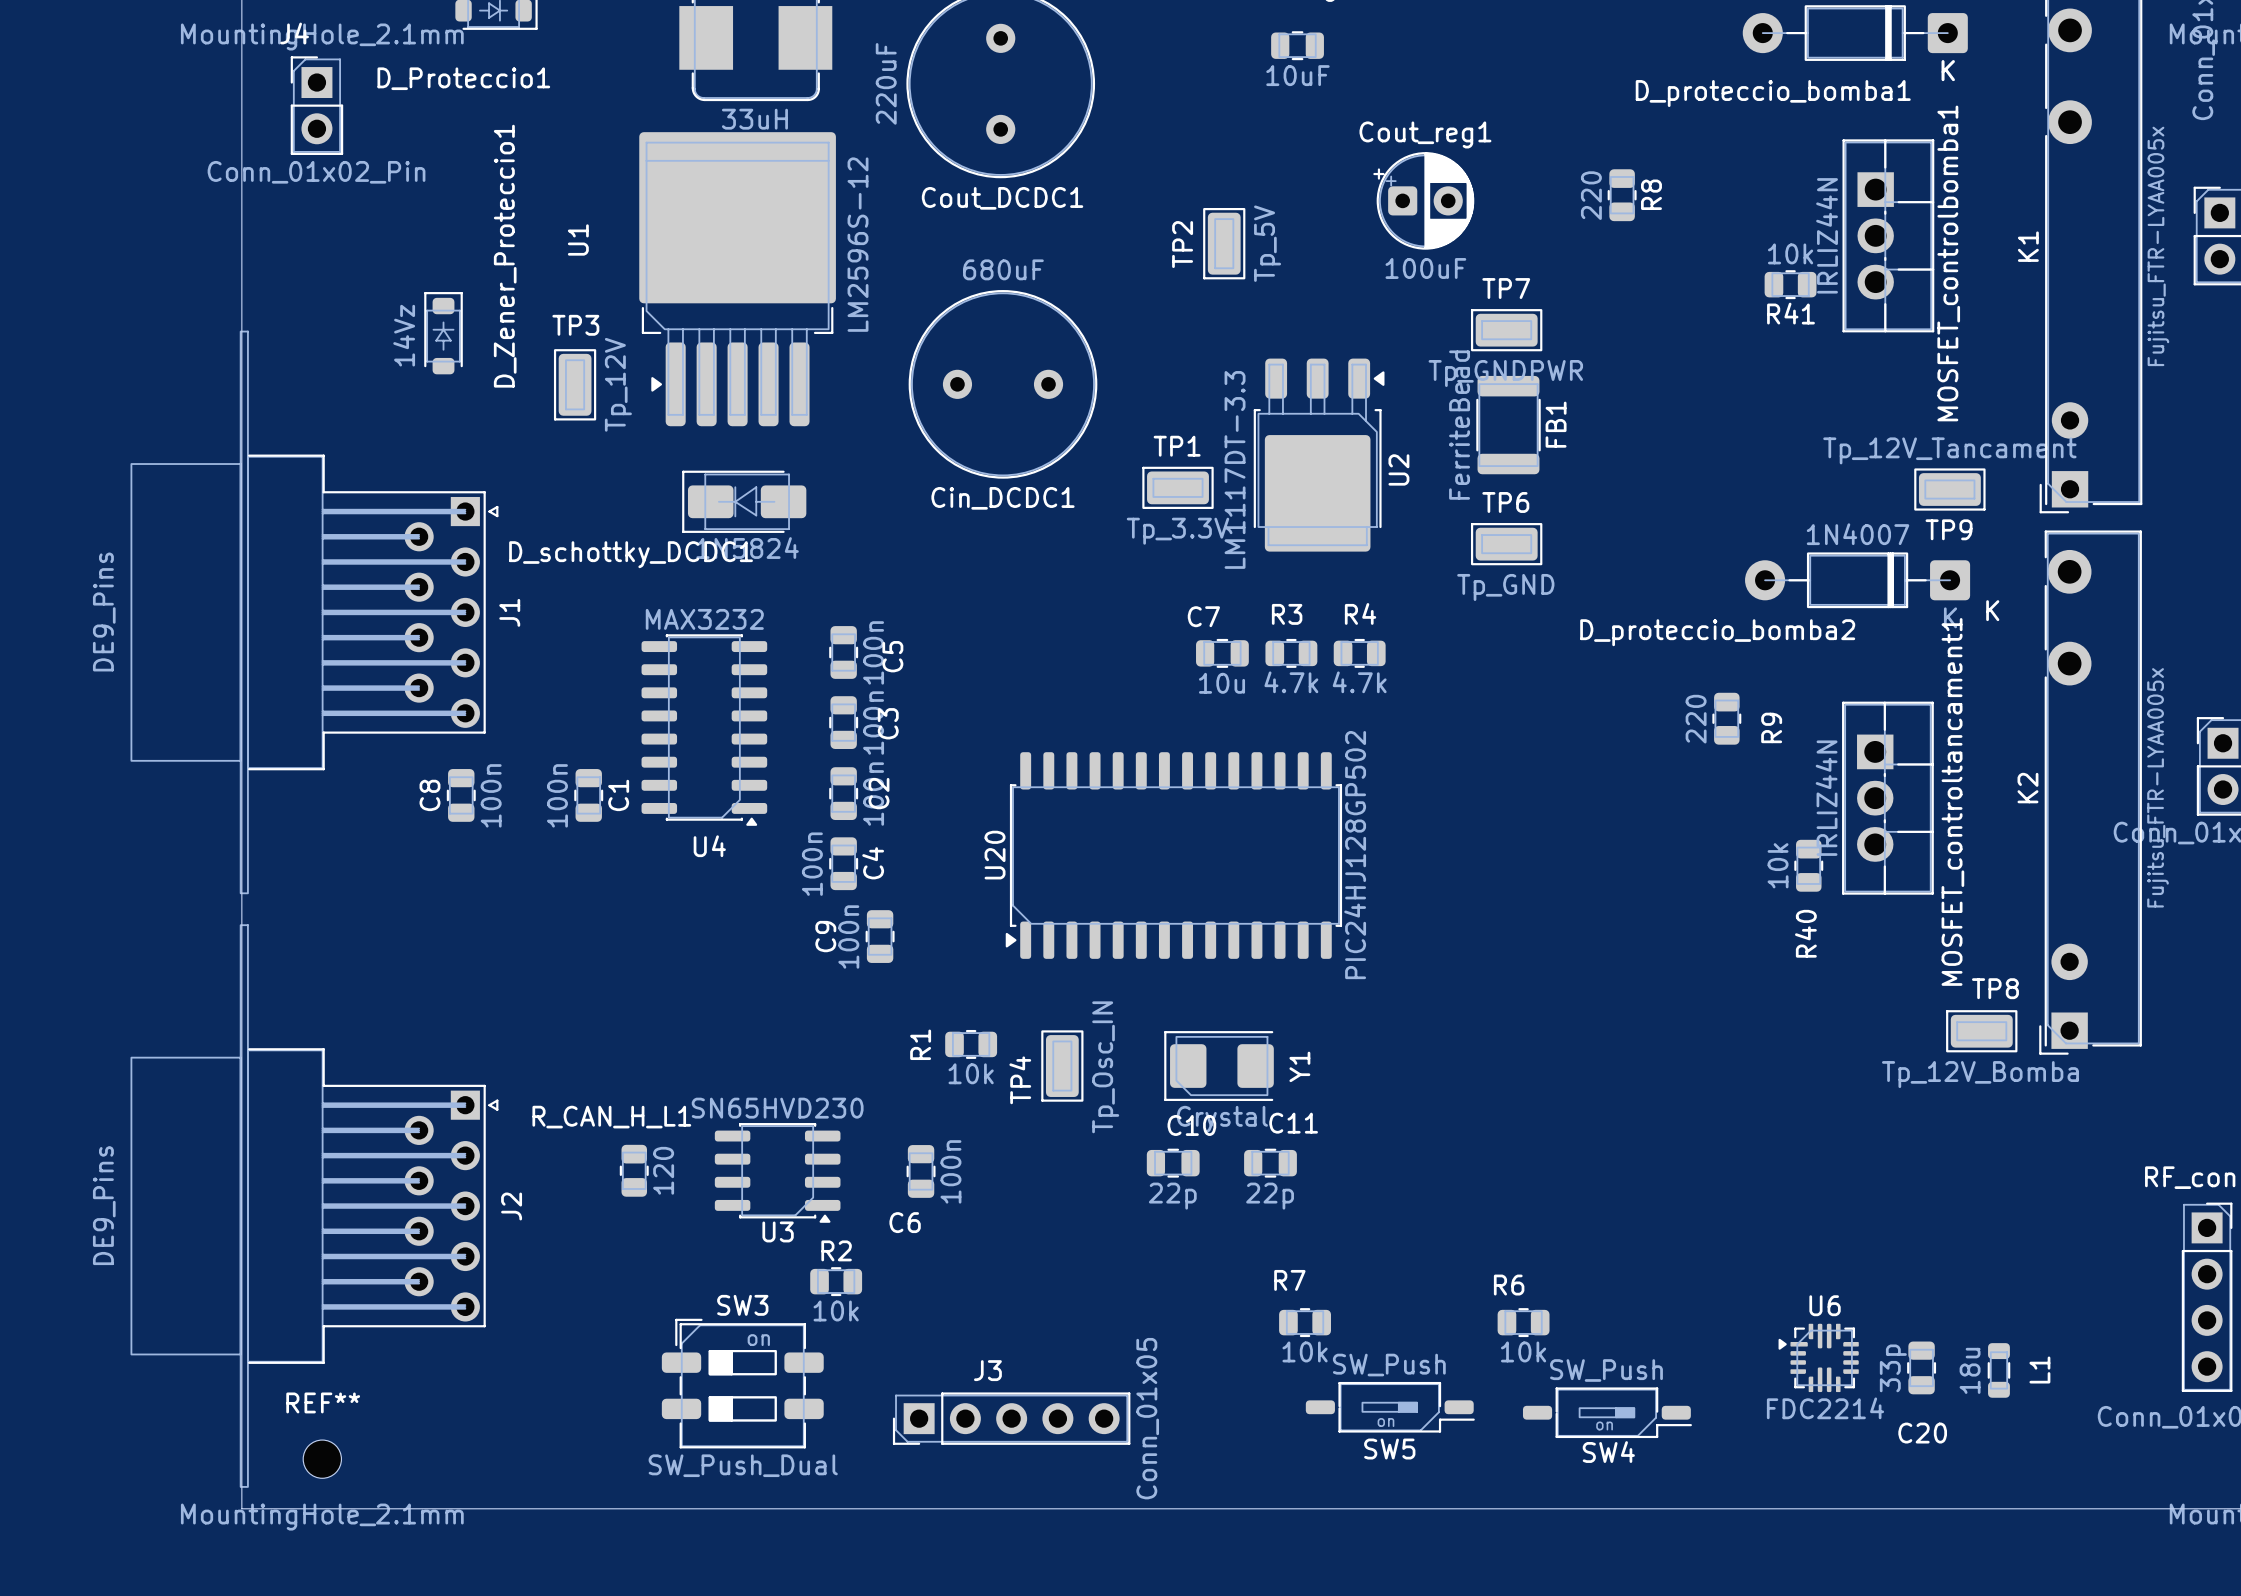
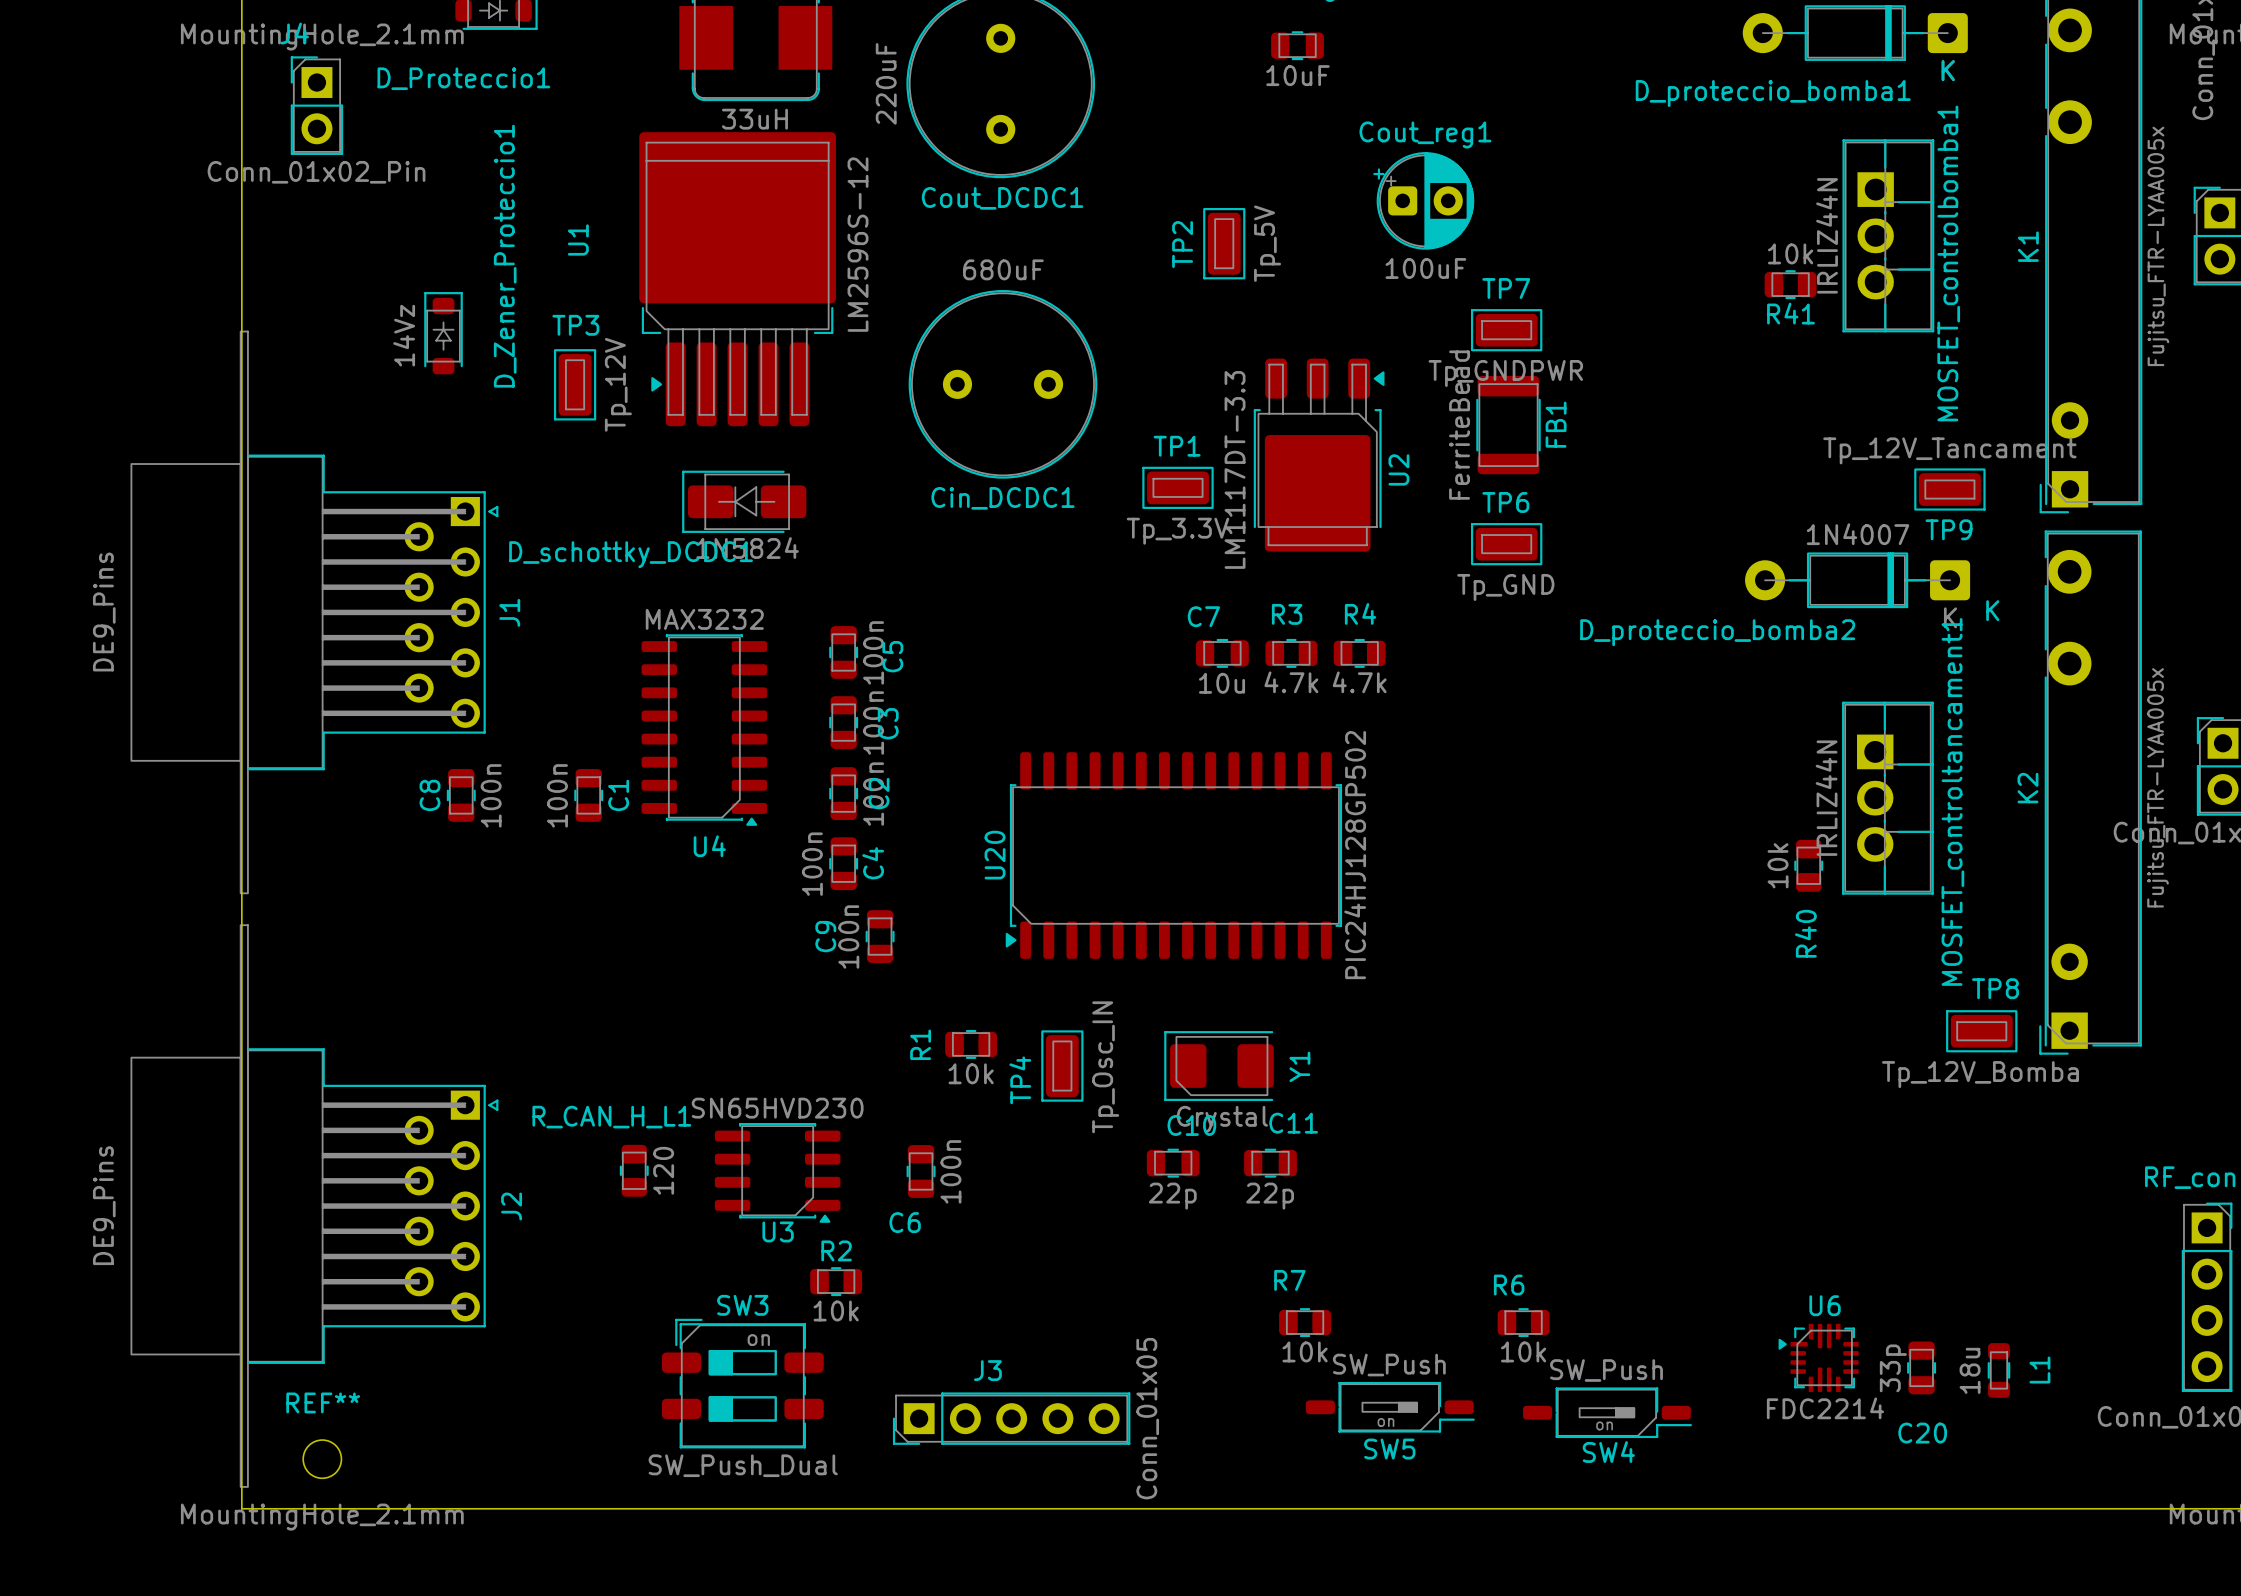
R8: 220 (1622, 195) -> none
R9: 220 (1726, 718) -> none

